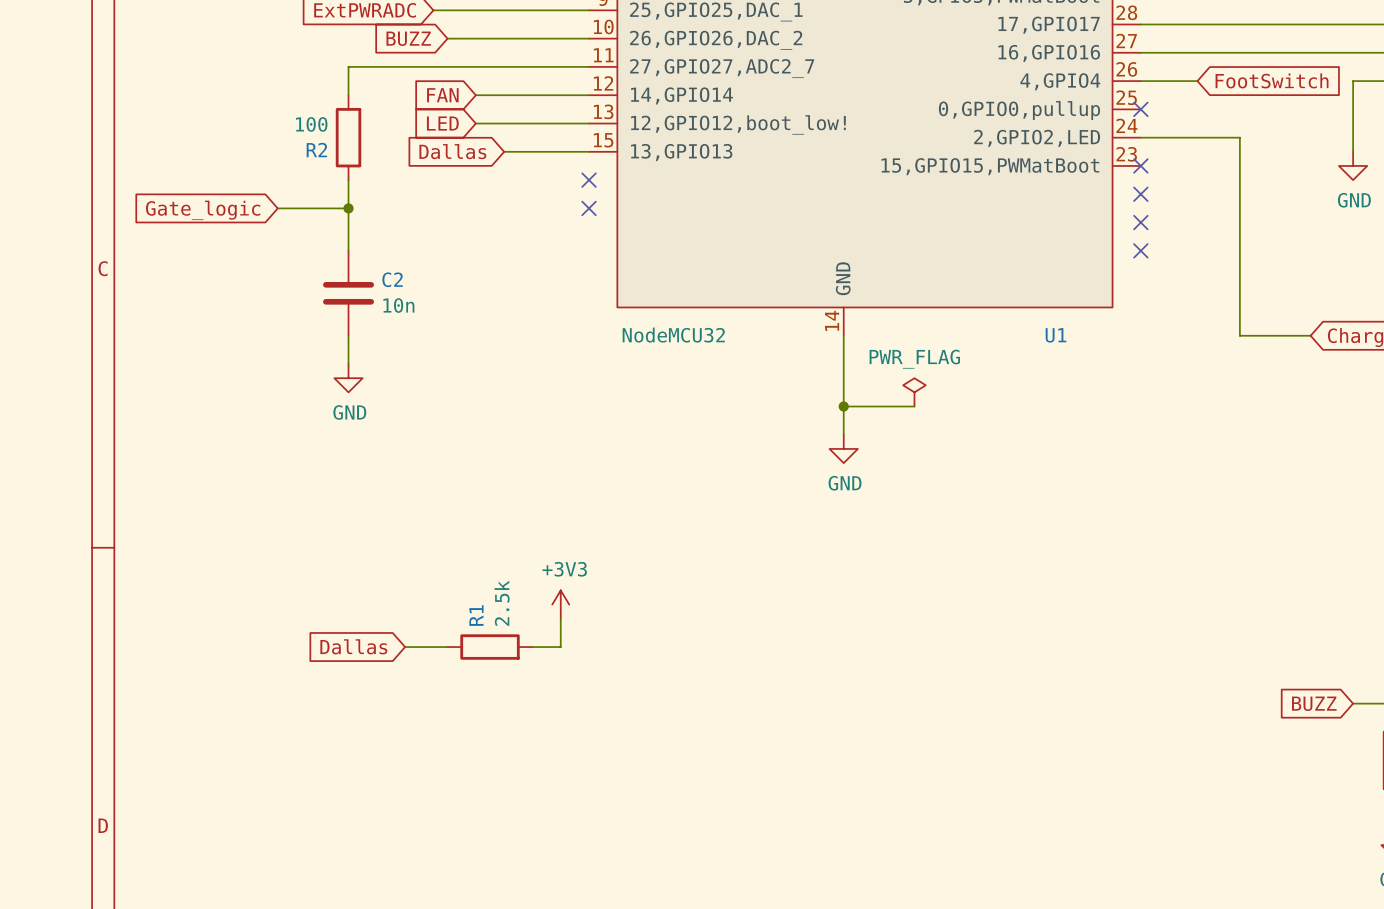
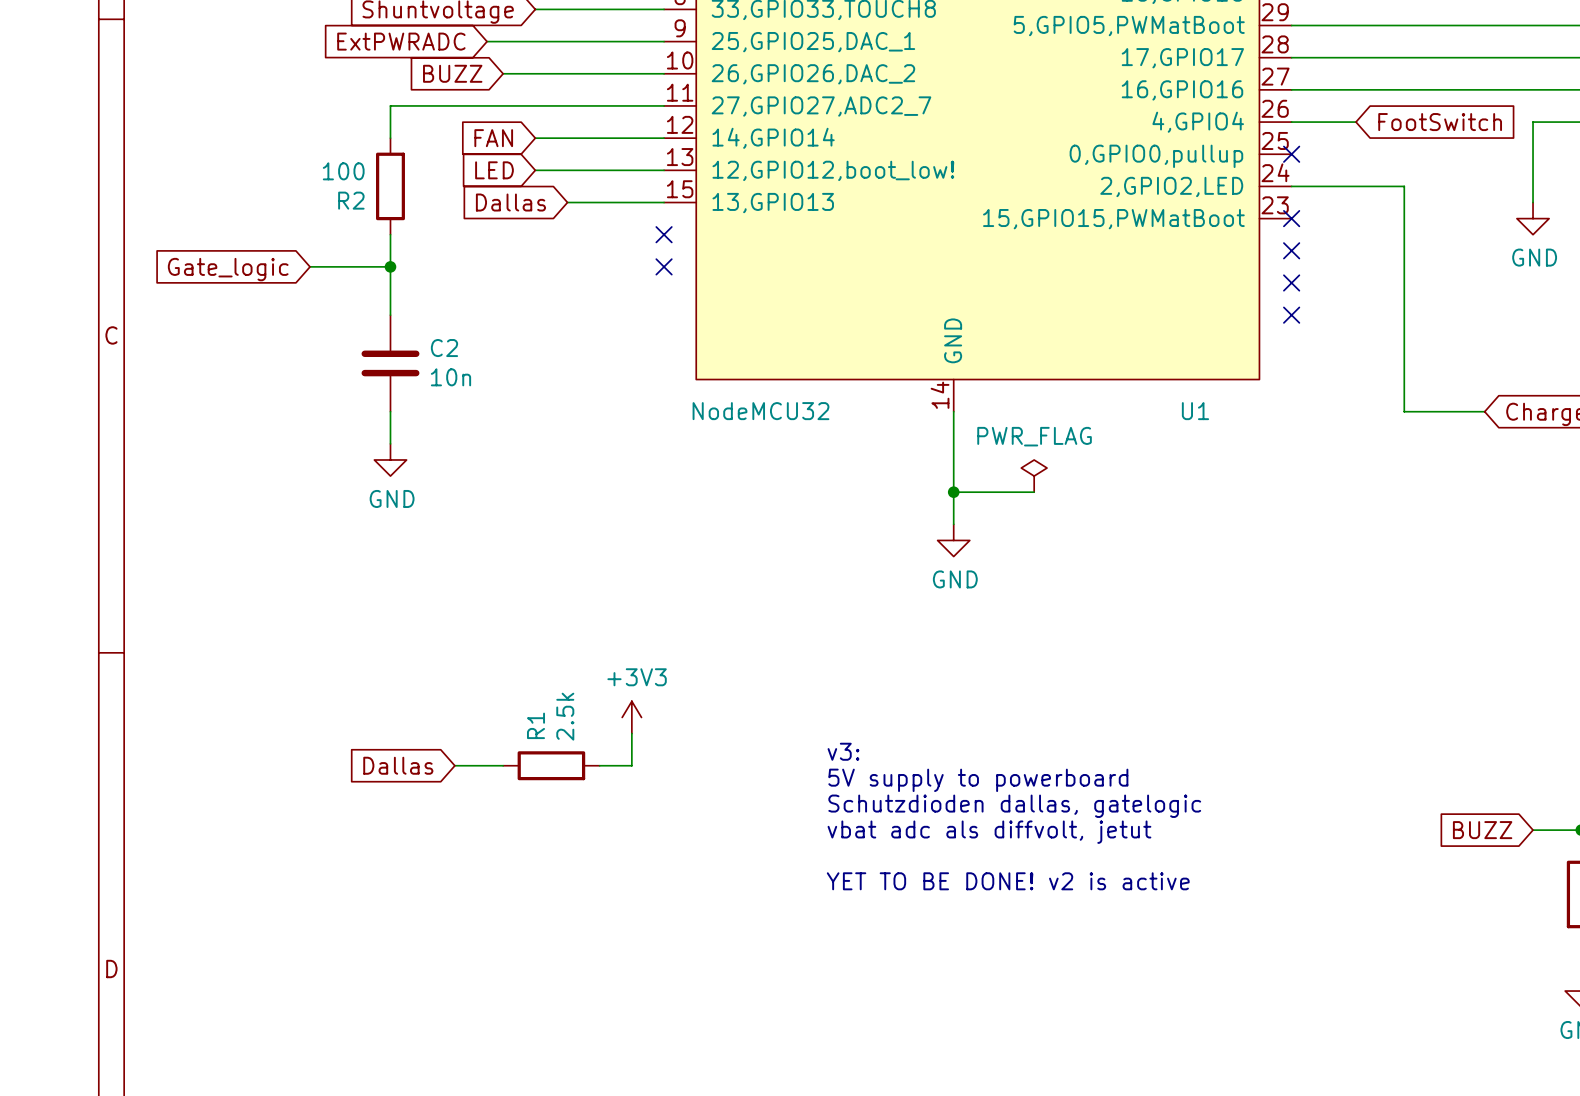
text: none -> v3: (843, 751)
text: none -> 5V supply to powerboard (978, 780)
text: none -> Schutzdioden dallas, gatelogic (1014, 806)
text: none -> vbat adc als diffvolt, jetut (989, 832)
text: none -> YET TO BE DONE! v2 is active (1008, 881)

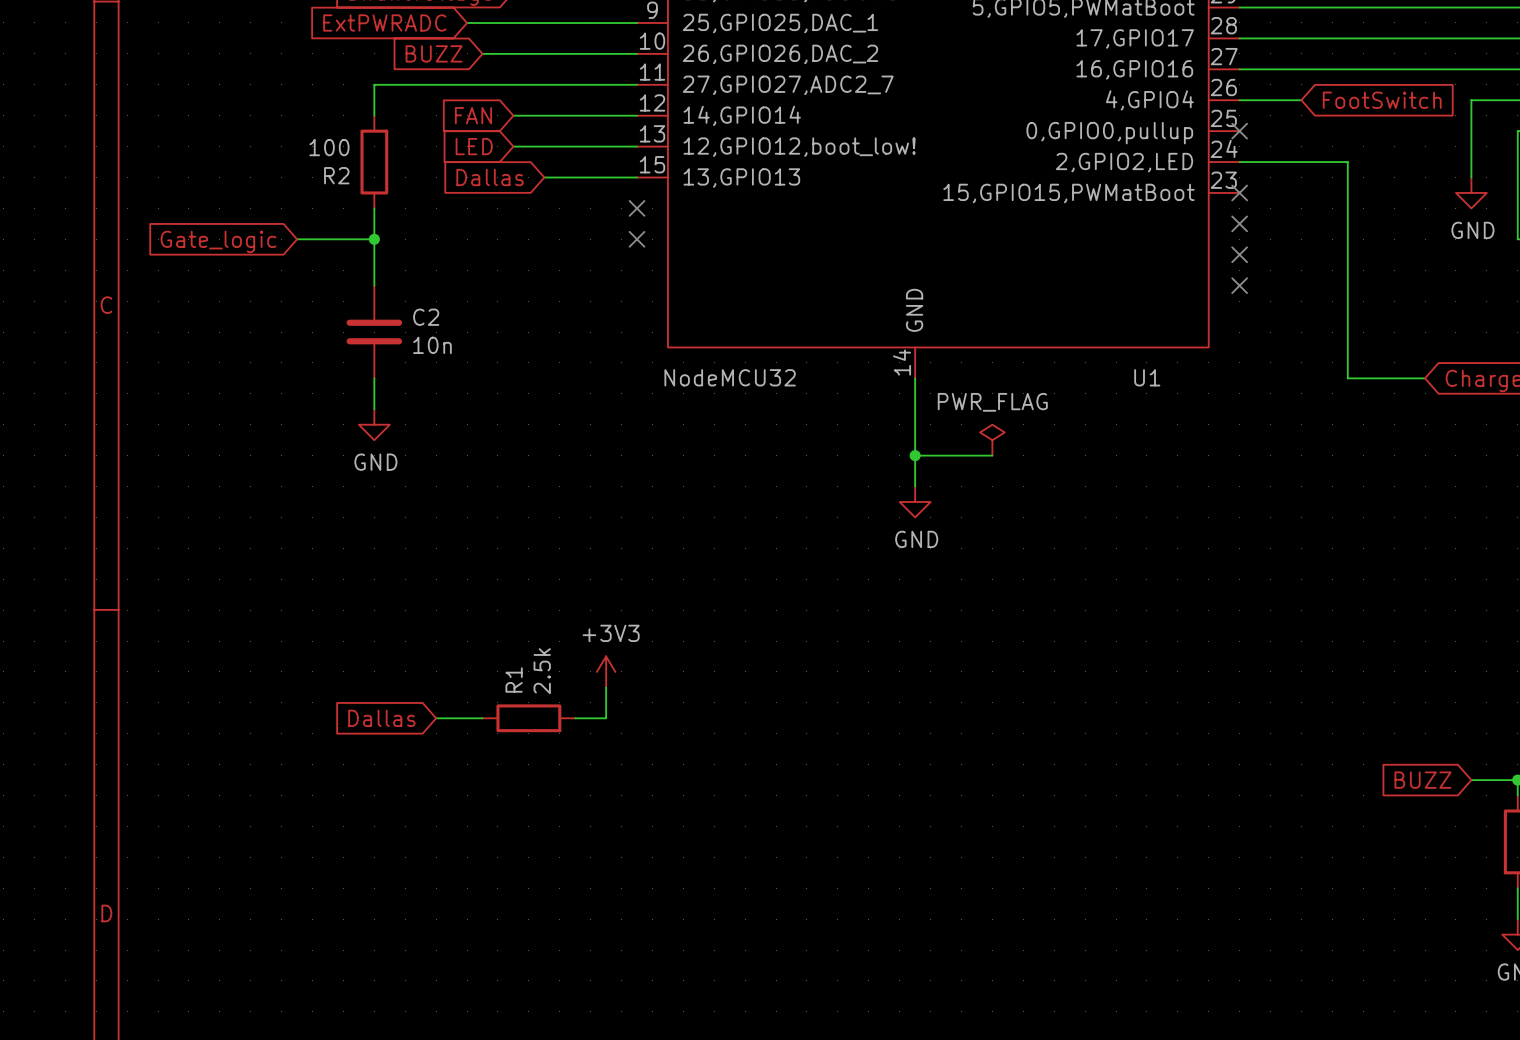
text: v3: (843, 751) -> none
text: 5V supply to powerboard (978, 780) -> none
text: Schutzdioden dallas, gatelogic (1014, 806) -> none
text: vbat adc als diffvolt, jetut (989, 832) -> none
text: YET TO BE DONE! v2 is active (1008, 881) -> none

